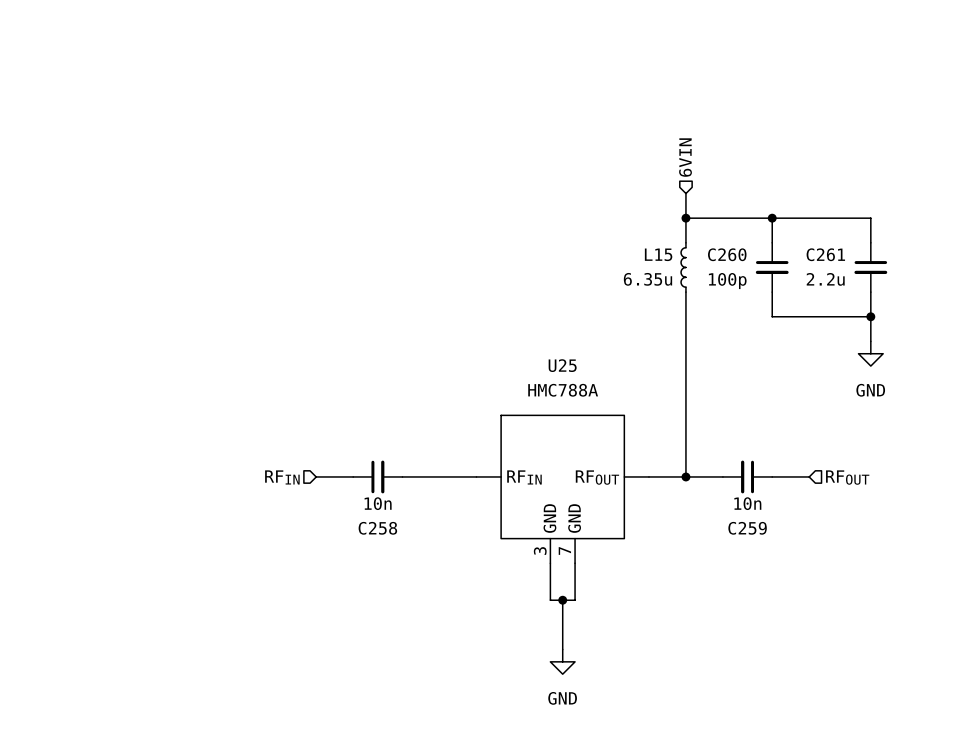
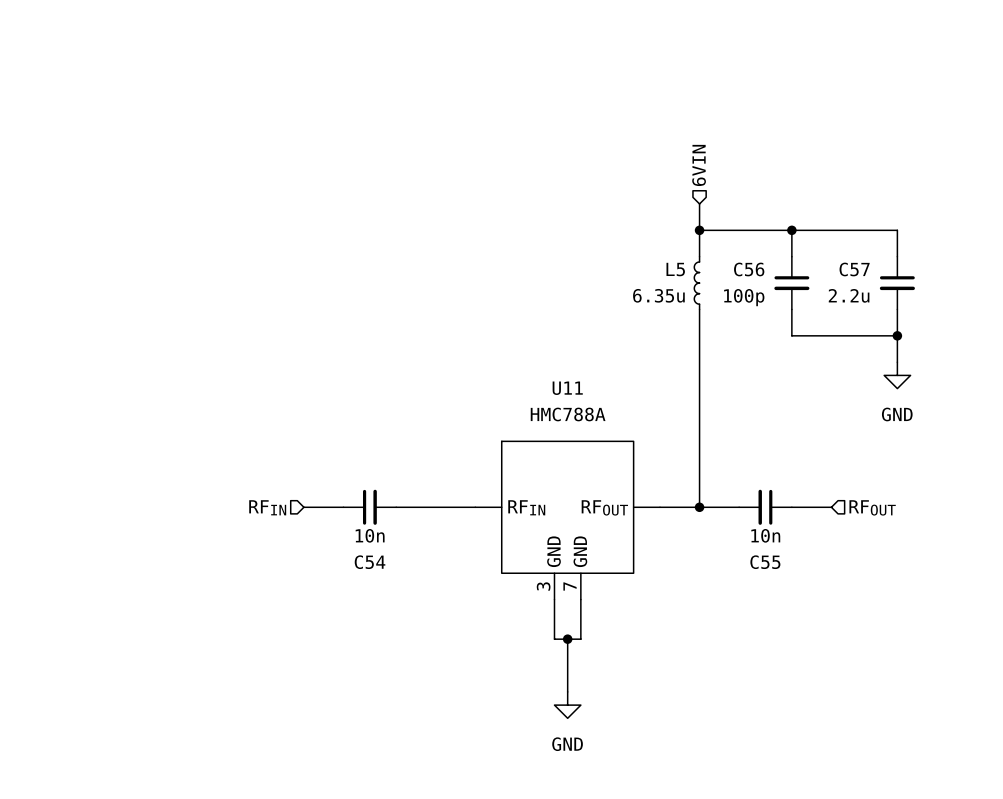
L15 name: L15 (658, 254) -> L5 (675, 269)
C260 name: C260 (727, 254) -> C56 (749, 269)
C261 name: C261 (825, 254) -> C57 (854, 269)
U25 name: U25 (562, 365) -> U11 (567, 388)
C258 name: C258 (377, 528) -> C54 (370, 562)
C259 name: C259 (747, 528) -> C55 (765, 562)

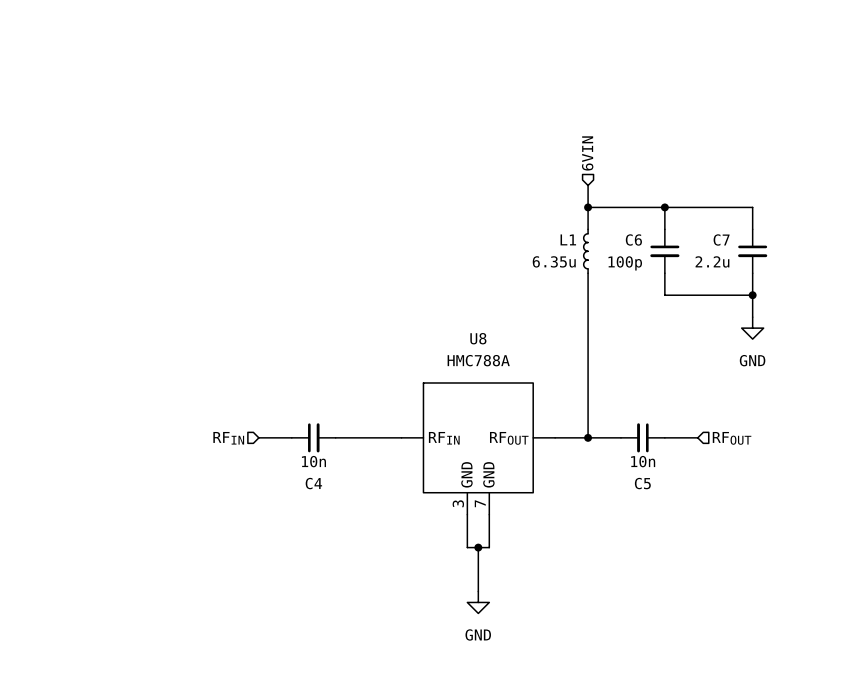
L5 name: L5 (675, 269) -> L1 (568, 239)
C56 name: C56 (749, 269) -> C6 (633, 239)
C57 name: C57 (854, 269) -> C7 (721, 239)
U11 name: U11 (567, 388) -> U8 (478, 338)
C54 name: C54 (370, 562) -> C4 (313, 483)
C55 name: C55 (765, 562) -> C5 (642, 483)

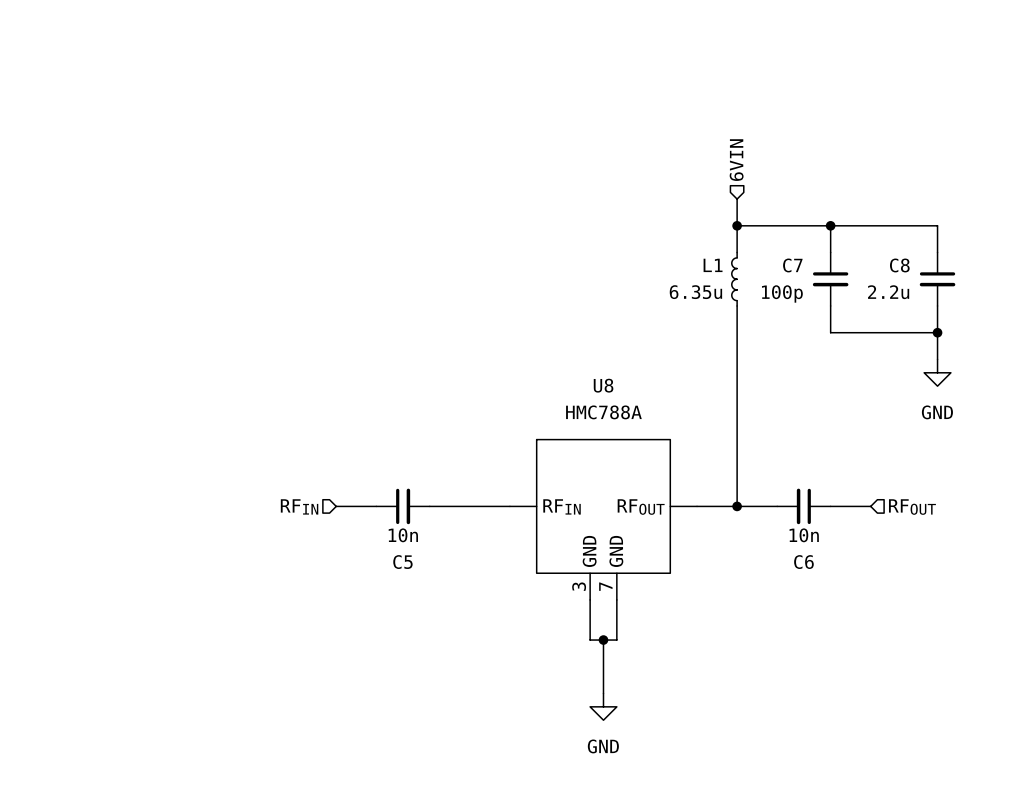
C6 name: C6 (633, 239) -> C7 (792, 265)
C7 name: C7 (721, 239) -> C8 (899, 265)
C4 name: C4 (313, 483) -> C5 (402, 562)
C5 name: C5 (642, 483) -> C6 (803, 562)

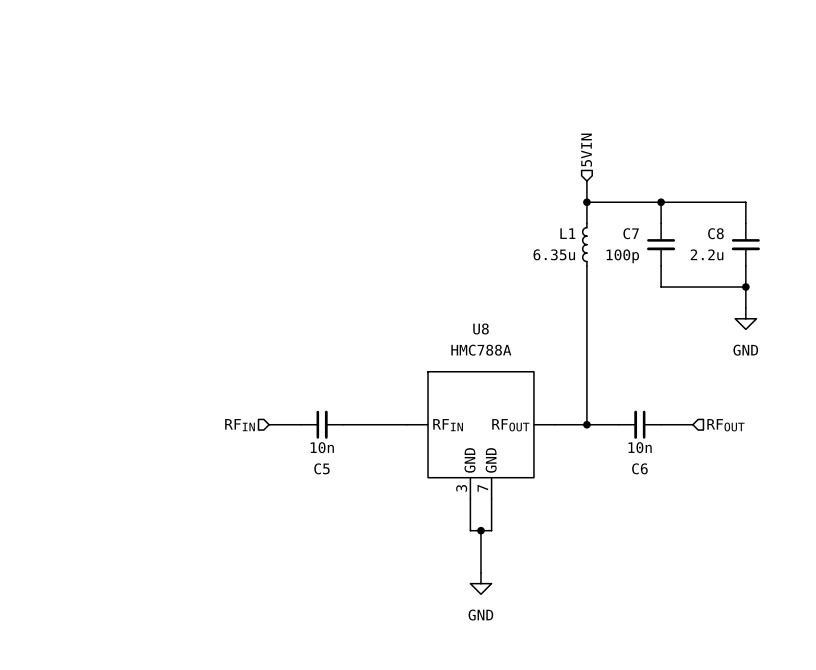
hierarchical label: 6VIN (736, 160) -> 5VIN (586, 150)

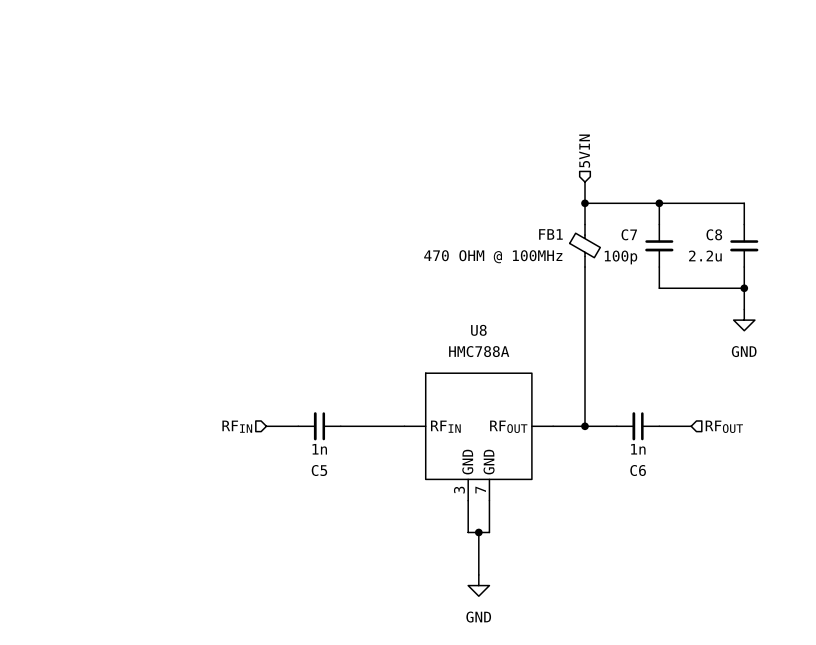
L1: 6.35u (584, 244) -> none
FB1: none -> 470 OHM @ 100MHz (585, 245)
C5 rotation: 0° (322, 424) -> 180° (319, 426)
C5 value: 10n (322, 447) -> 1n (319, 449)
C6 value: 10n (640, 447) -> 1n (638, 449)

